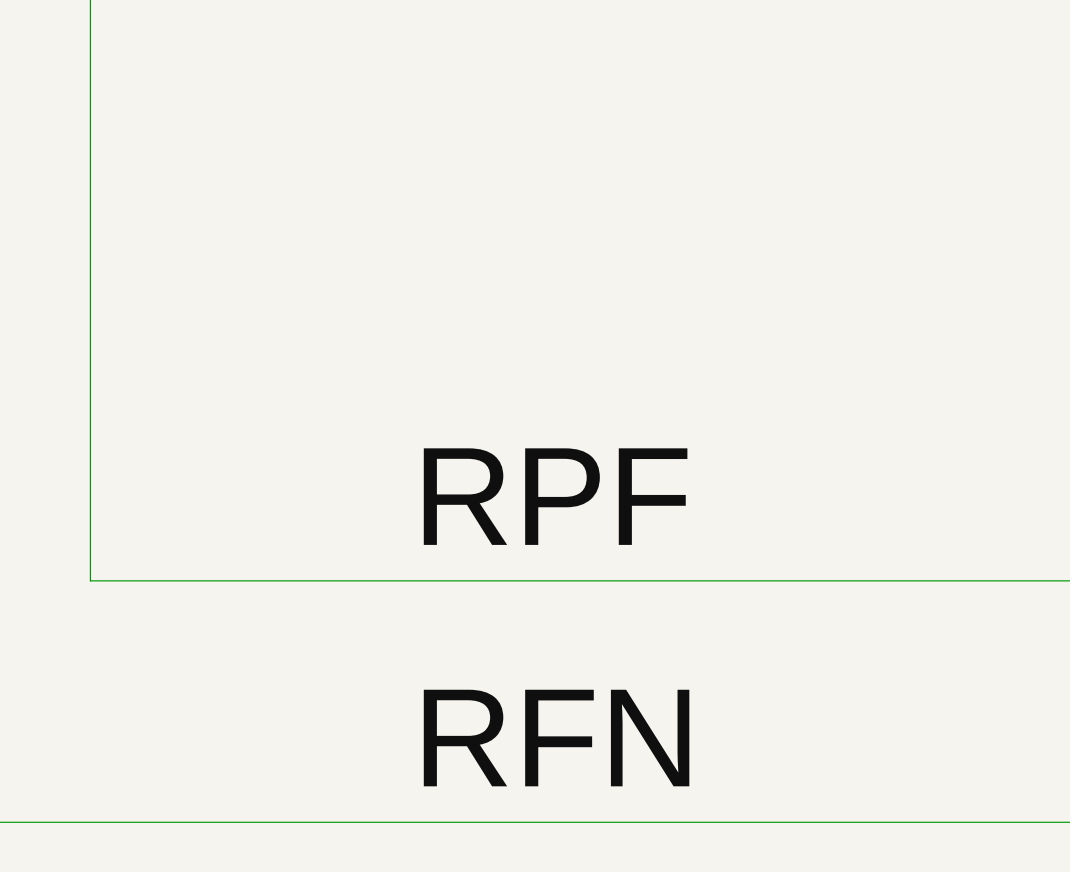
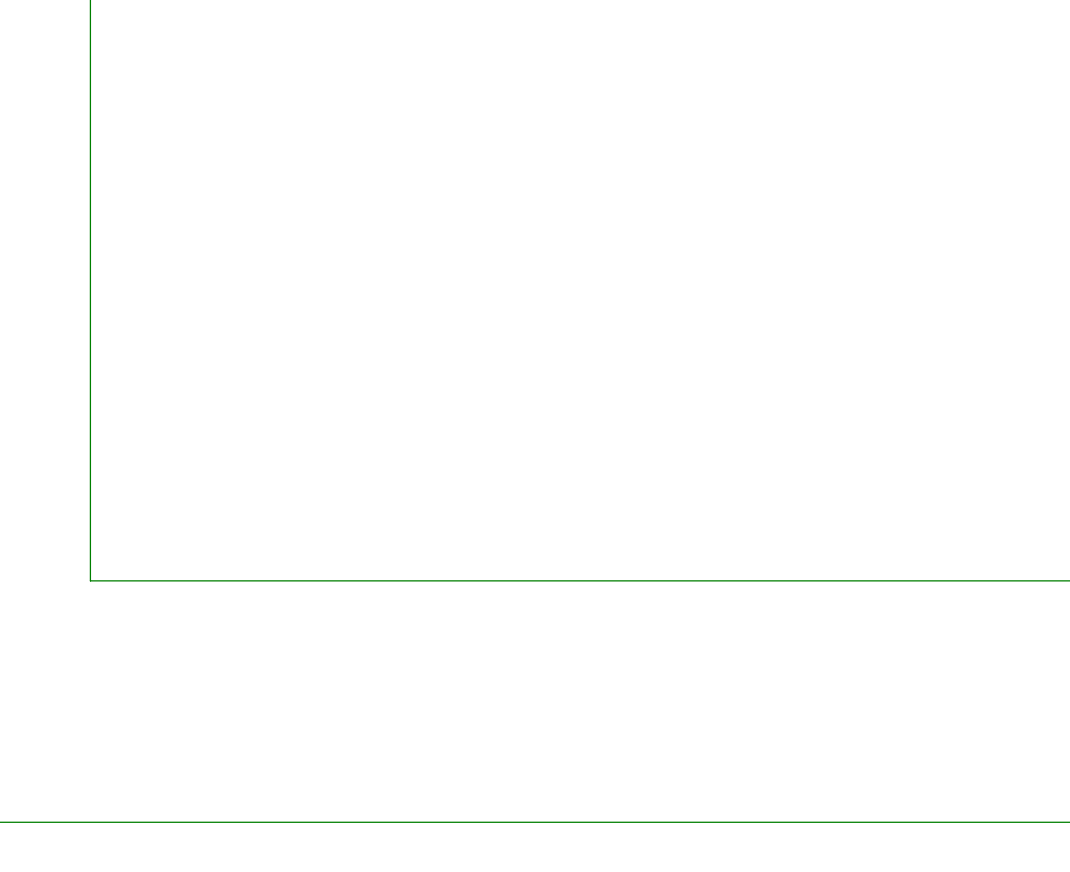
label: RPF (555, 496) -> none
label: RFN (556, 738) -> none

